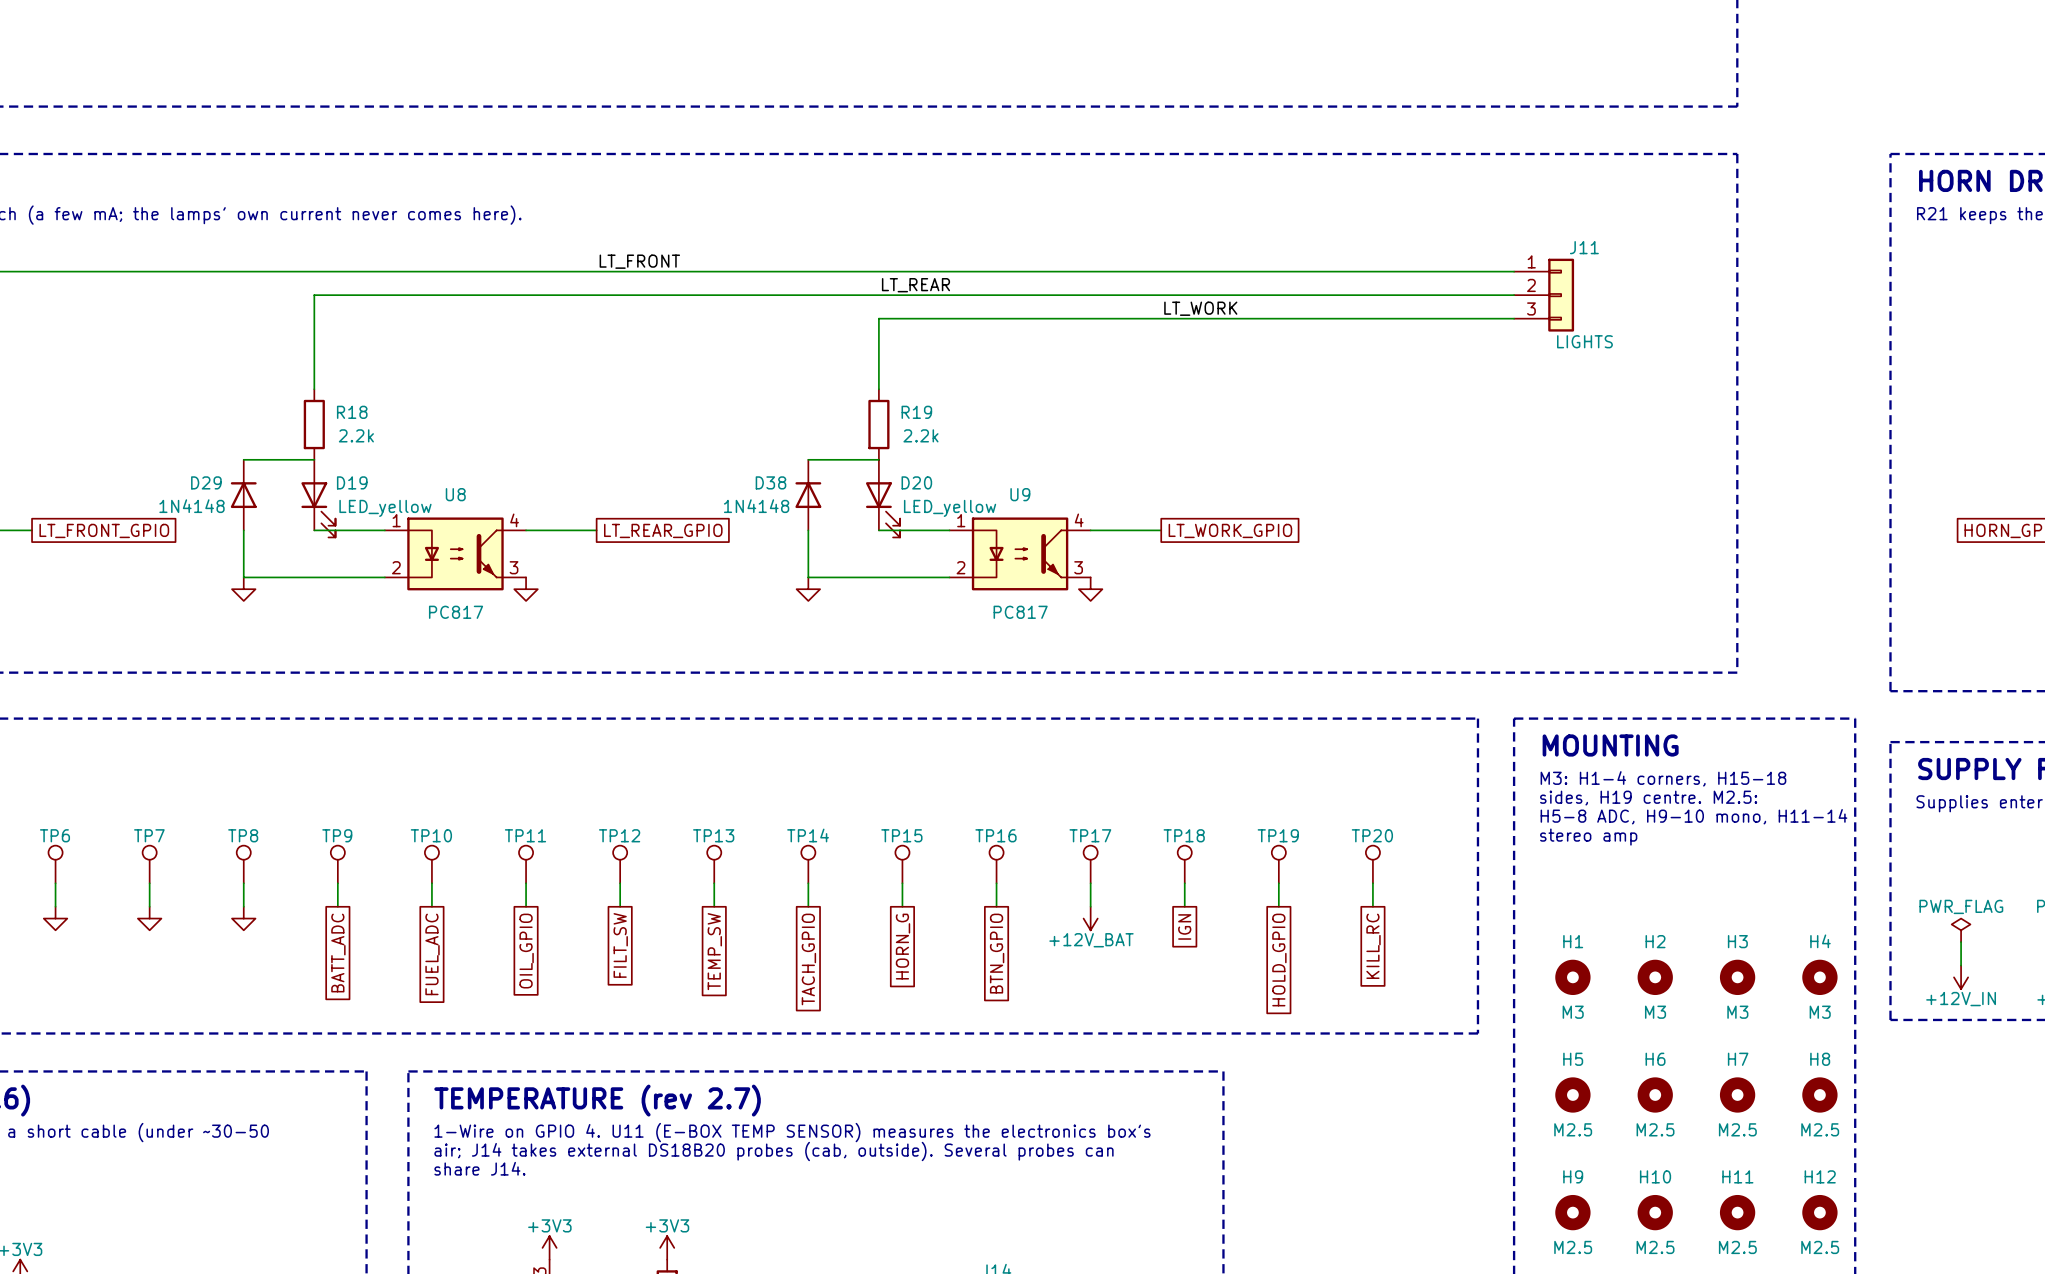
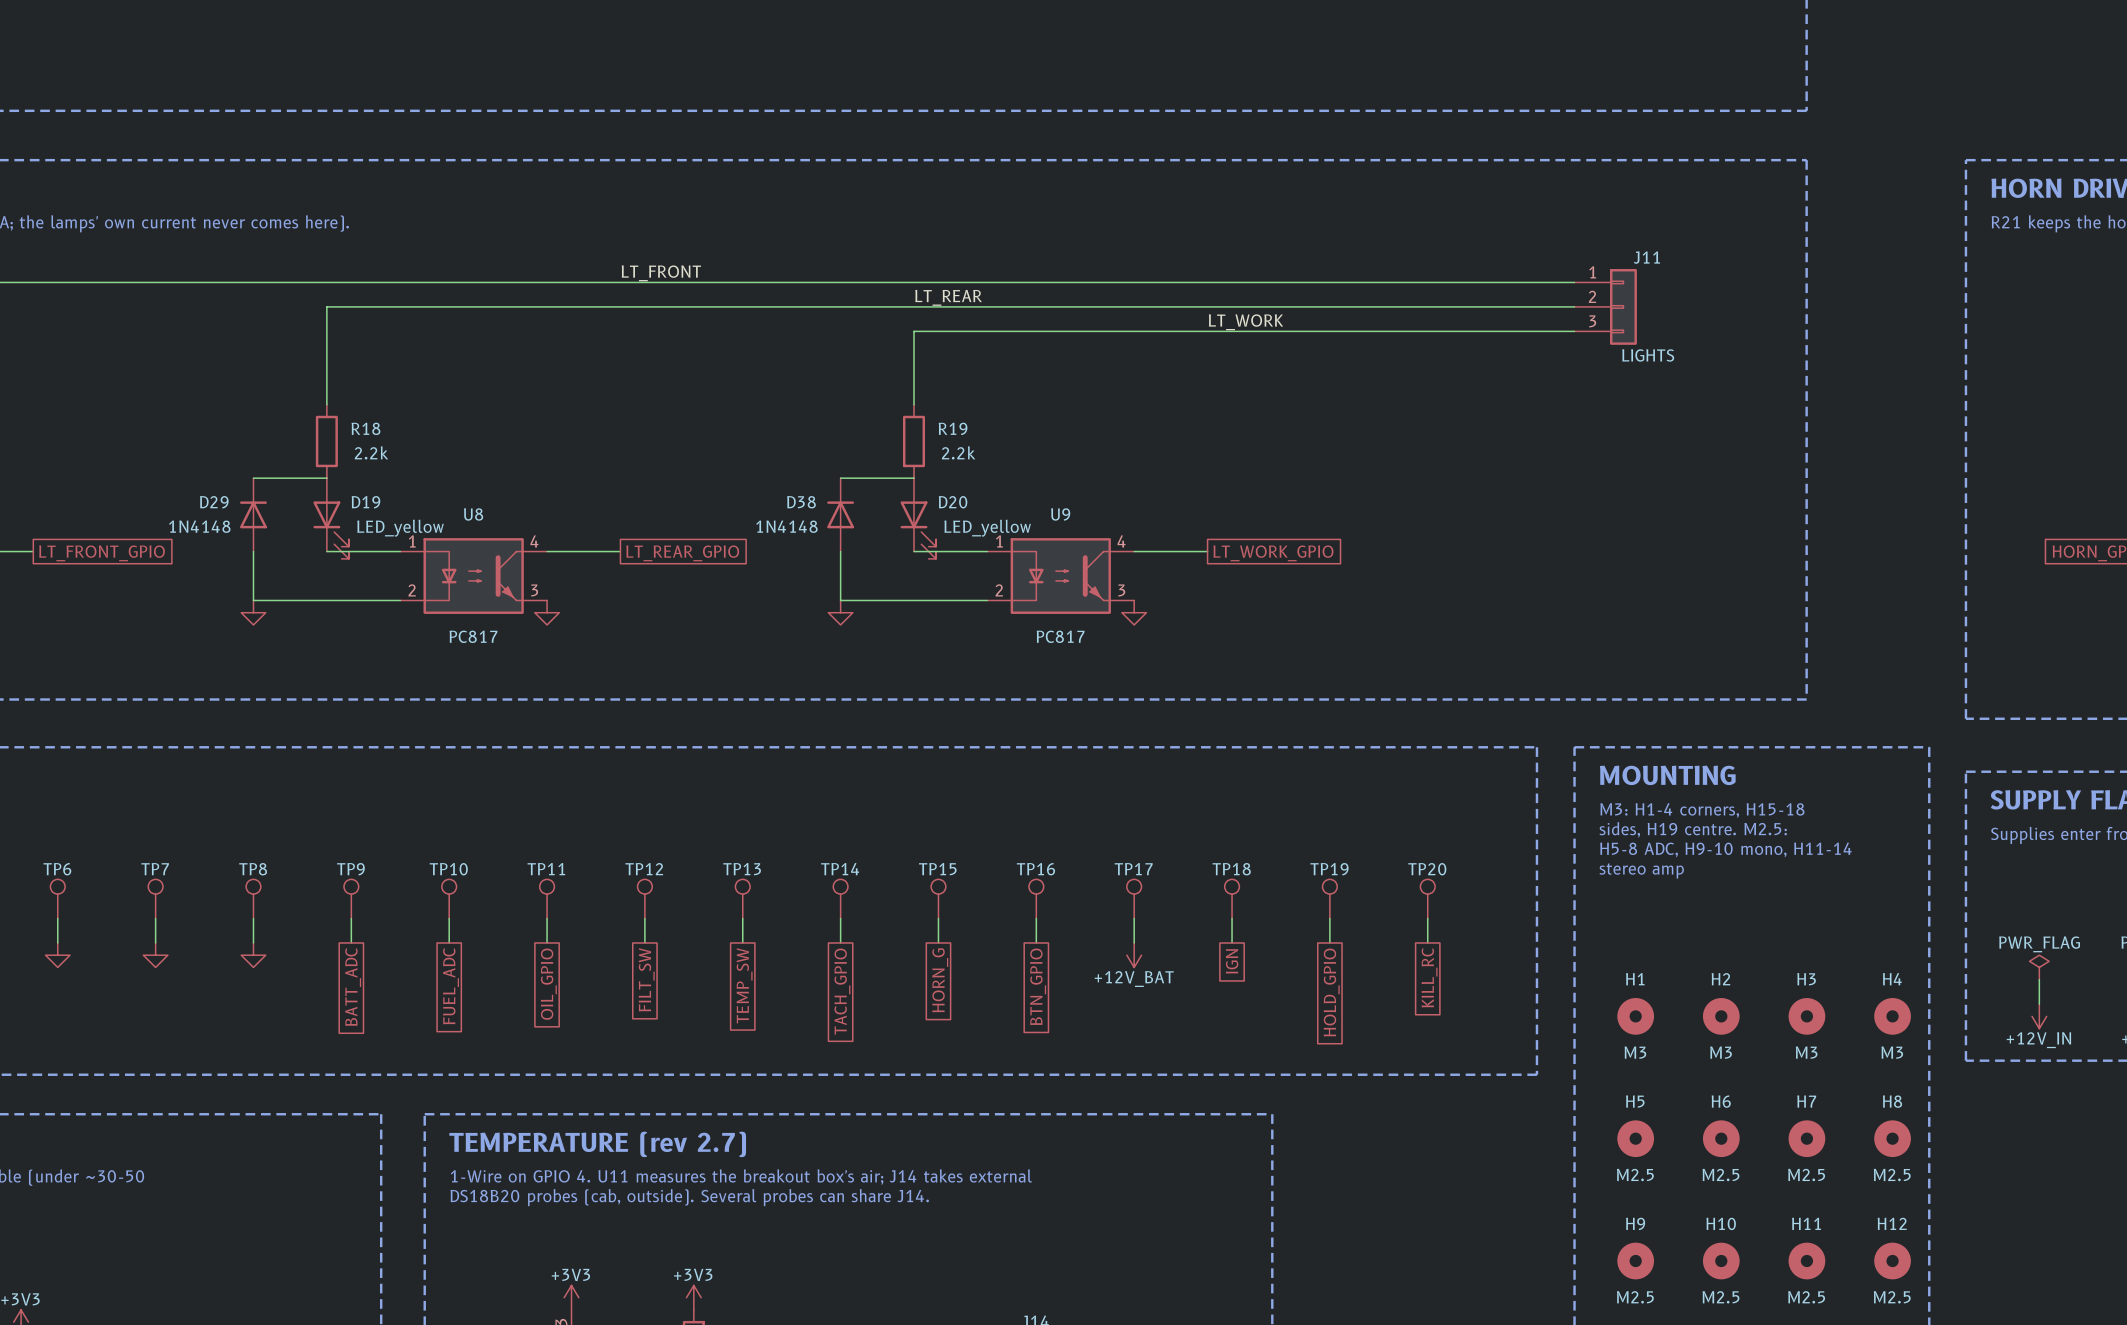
text: 1-Wire on GPIO 4. U11 (E-BOX TEMP SENSOR) measures the electronics box's (792, 1132) -> 1-Wire on GPIO 4. U11 measures the breakout box's air; J14 takes external (741, 1177)
text: air; J14 takes external DS18B20 probes (cab, outside). Several probes can (773, 1151) -> DS18B20 probes (cab, outside). Several probes can share J14. (689, 1197)
text: share J14. (479, 1168) -> none

